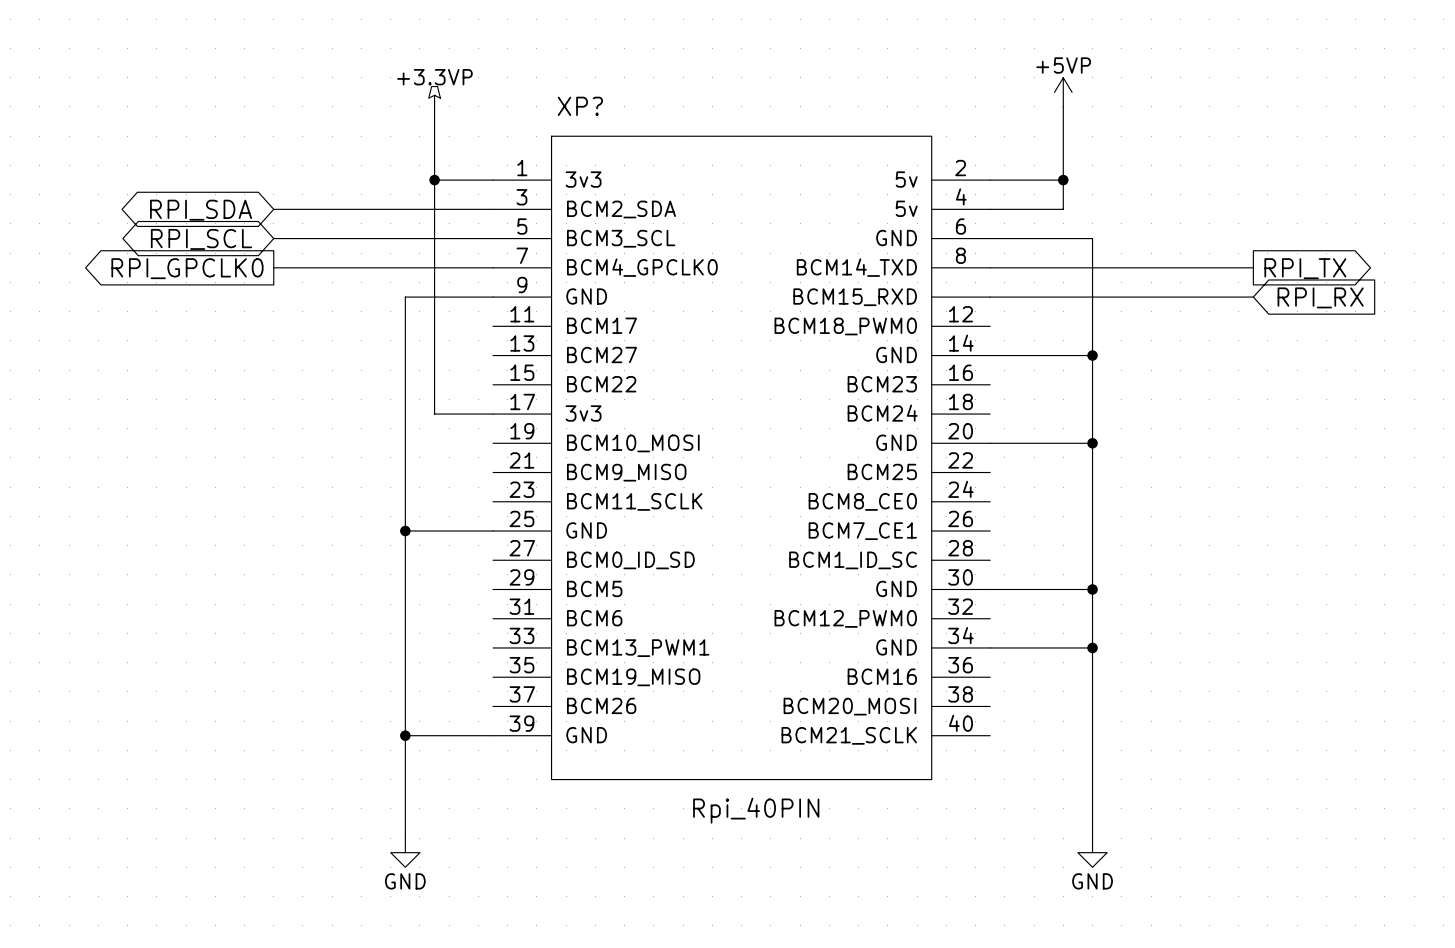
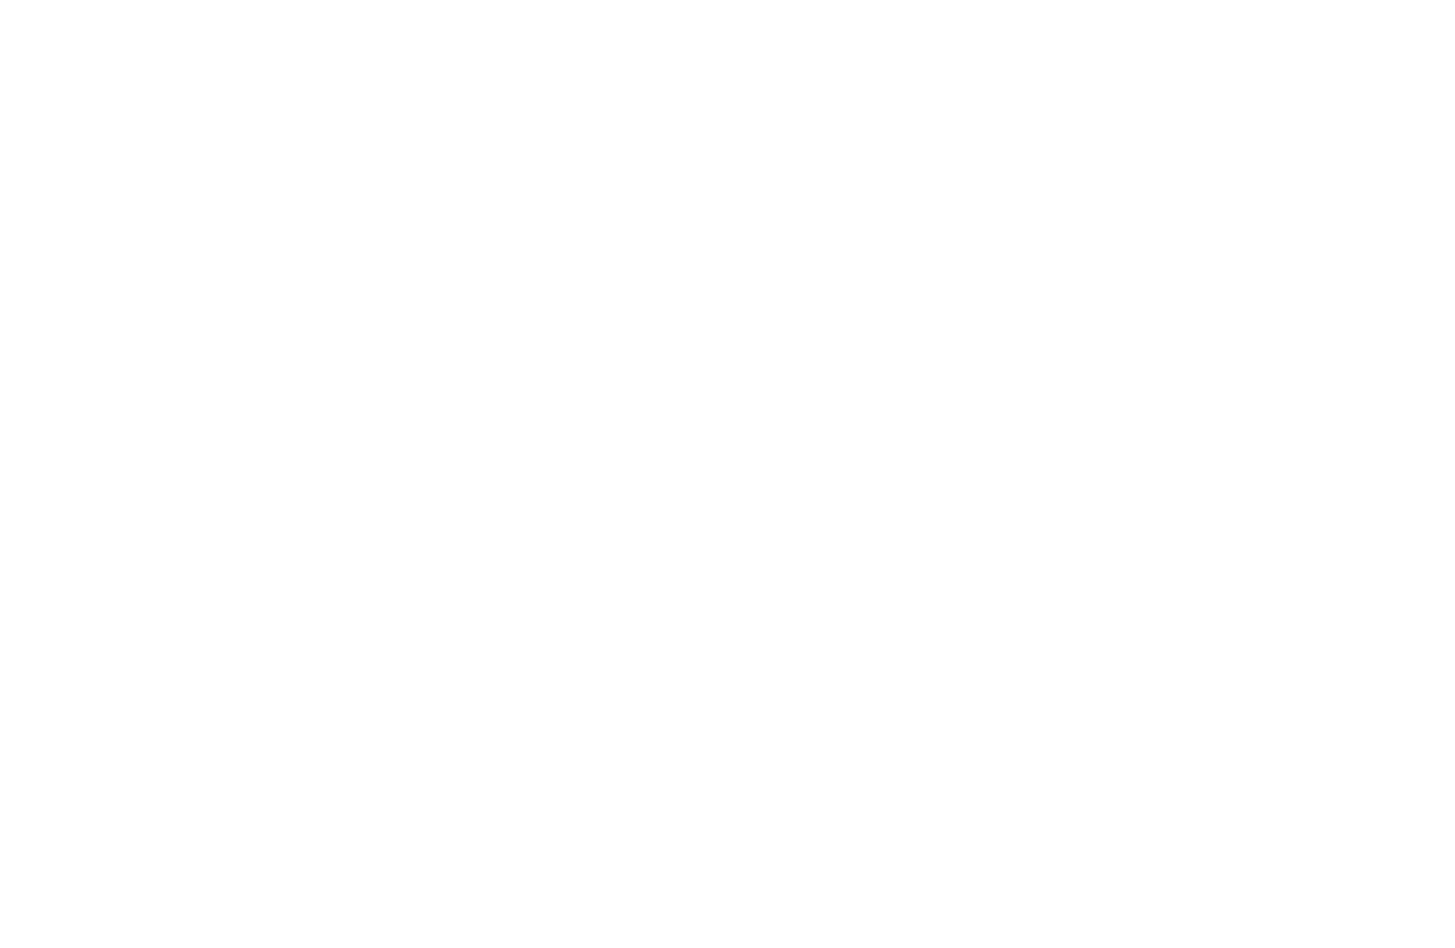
power symbol: +5VP (1063, 92) -> none
power symbol: +3.3VP (434, 96) -> none
wire: (434, 106) (434, 414) (493, 414) -> none
wire: (1063, 106) (1063, 209) (990, 209) -> none
wire: (434, 180) (493, 180) -> none
junction: (434, 180) -> none
wire: (990, 180) (1063, 180) -> none
junction: (1063, 180) -> none
wire: (273, 209) (493, 209) -> none
global label: RPI_SDA (201, 210) -> none
wire: (273, 238) (493, 238) -> none
wire: (990, 238) (1092, 238) (1092, 838) -> none
global label: RPI_SCL (201, 239) -> none
wire: (273, 267) (493, 267) -> none
wire: (990, 267) (1253, 267) -> none
global label: RPI_GPCLK0 (187, 268) -> none
global label: RPI_TX (1305, 268) -> none
wire: (493, 297) (405, 297) (405, 838) -> none
wire: (990, 297) (1253, 297) -> none
global label: RPI_RX (1320, 297) -> none
wire: (990, 355) (1092, 355) -> none
junction: (1092, 355) -> none
wire: (990, 443) (1092, 443) -> none
junction: (1092, 443) -> none
XP?: Rpi_40PIN (741, 457) -> none
wire: (405, 531) (493, 531) -> none
junction: (405, 531) -> none
wire: (990, 589) (1092, 589) -> none
junction: (1092, 589) -> none
wire: (990, 647) (1092, 647) -> none
junction: (1092, 647) -> none
wire: (405, 735) (493, 735) -> none
junction: (405, 735) -> none
power symbol: GND (405, 852) -> none
power symbol: GND (1092, 852) -> none

